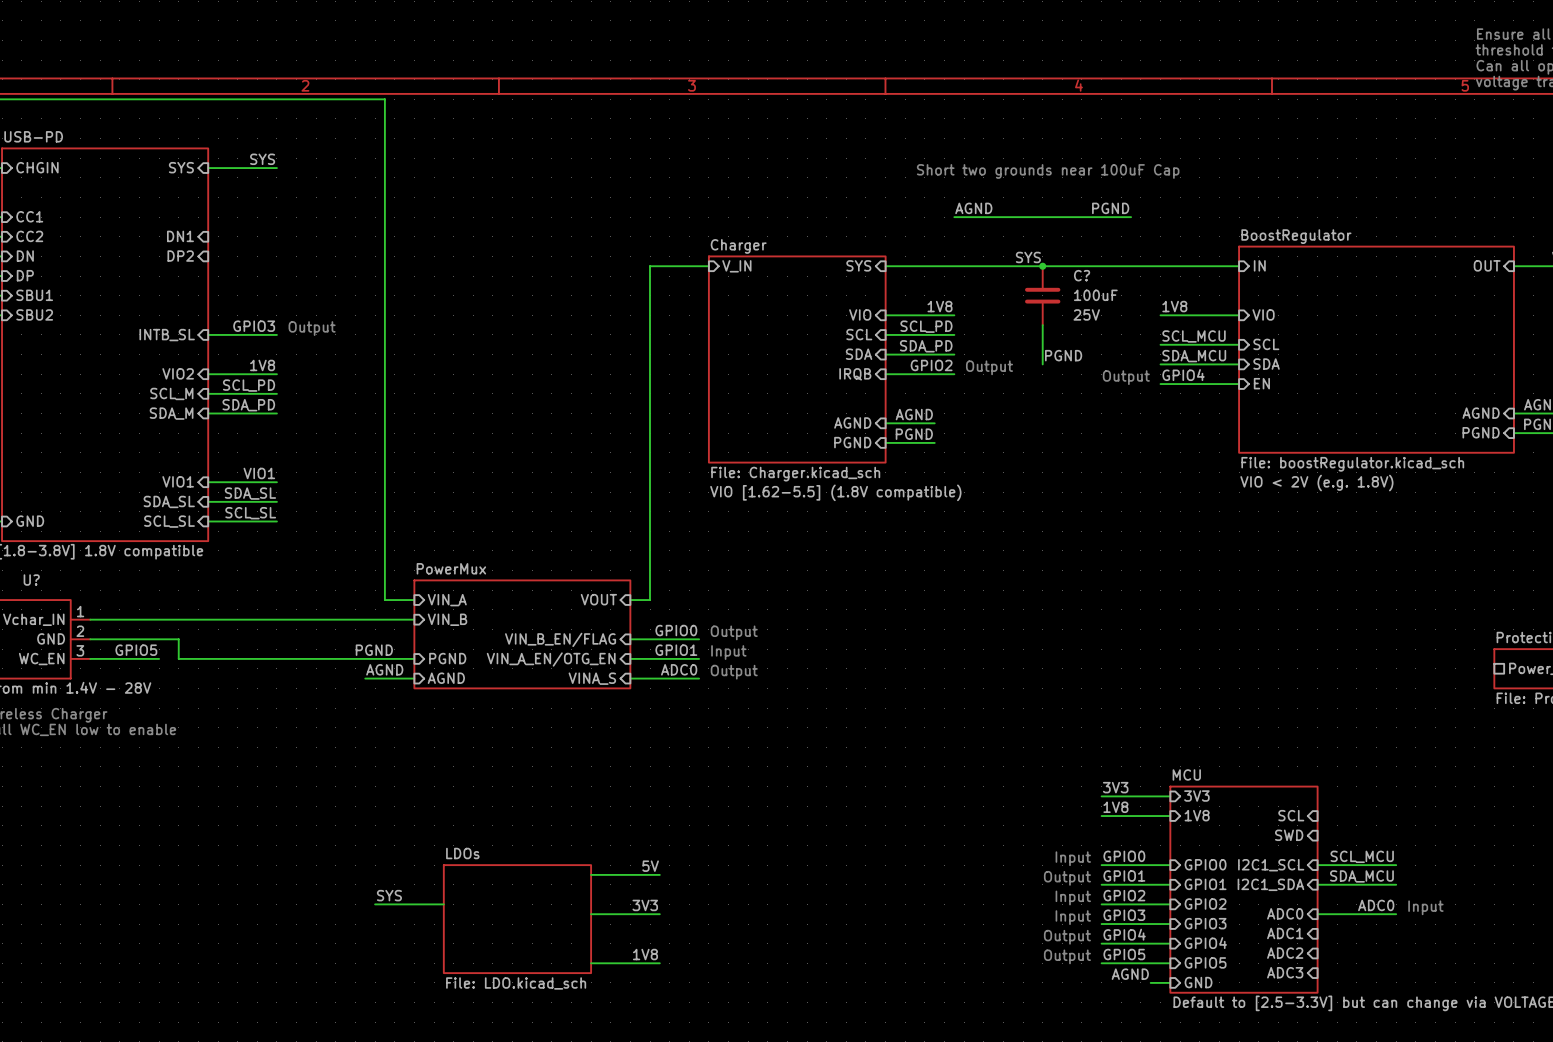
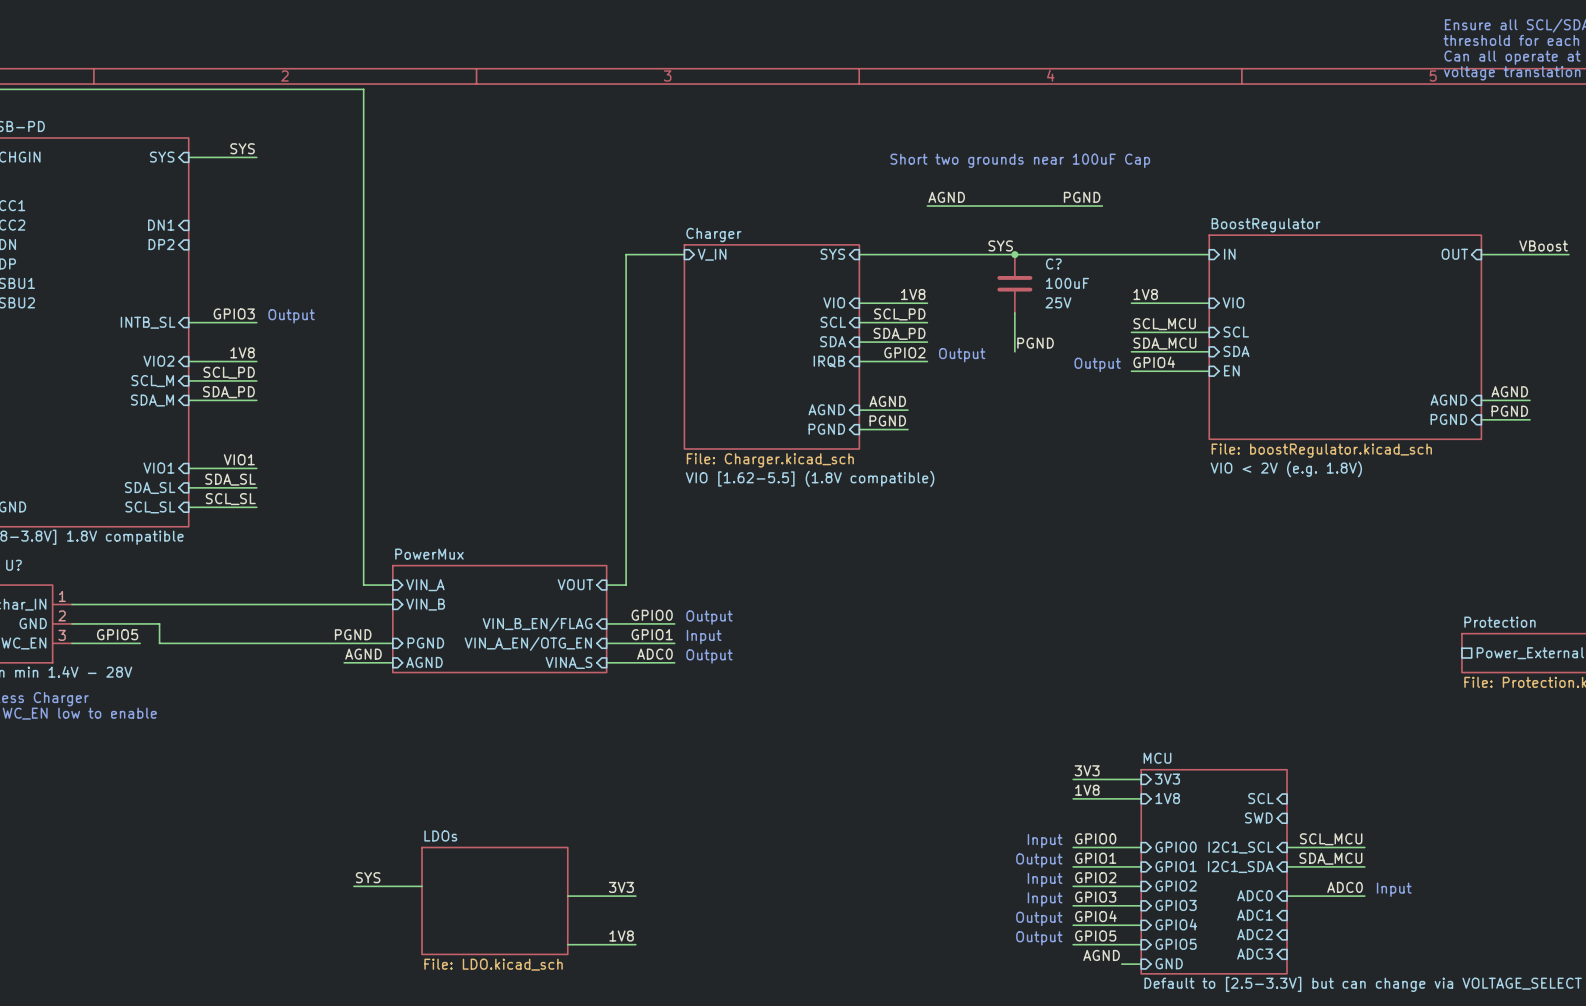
label: 5V (650, 866) -> none
wire: (591, 874) (659, 874) -> none

